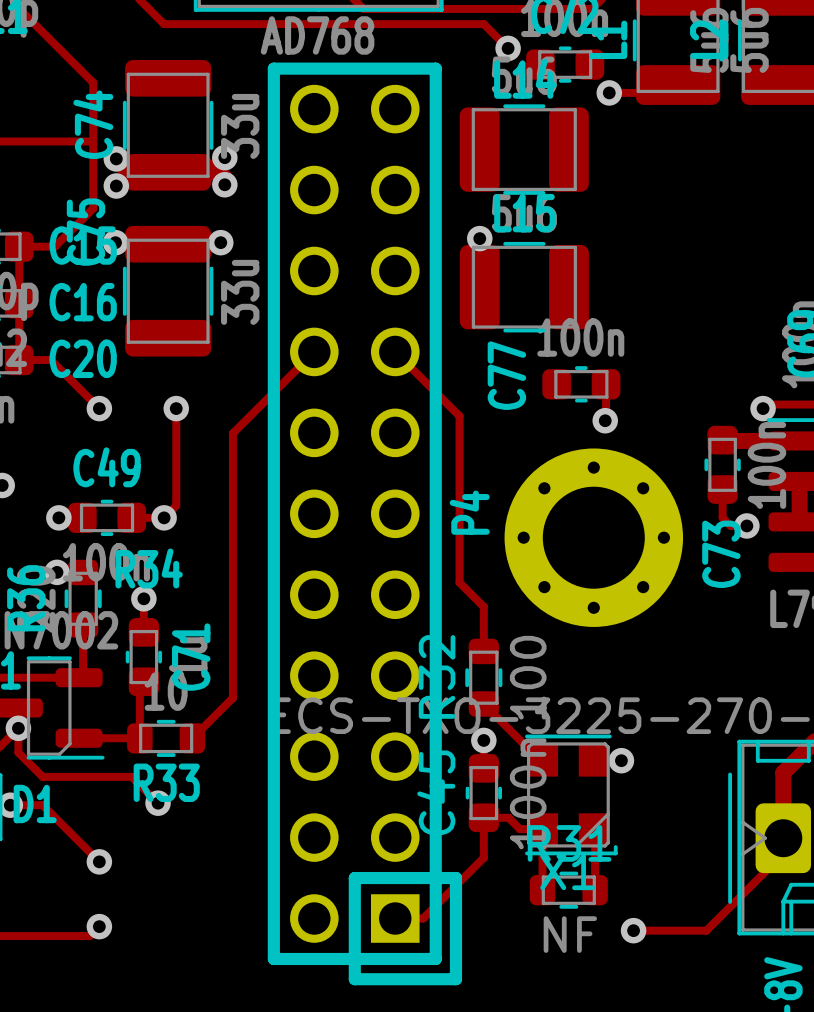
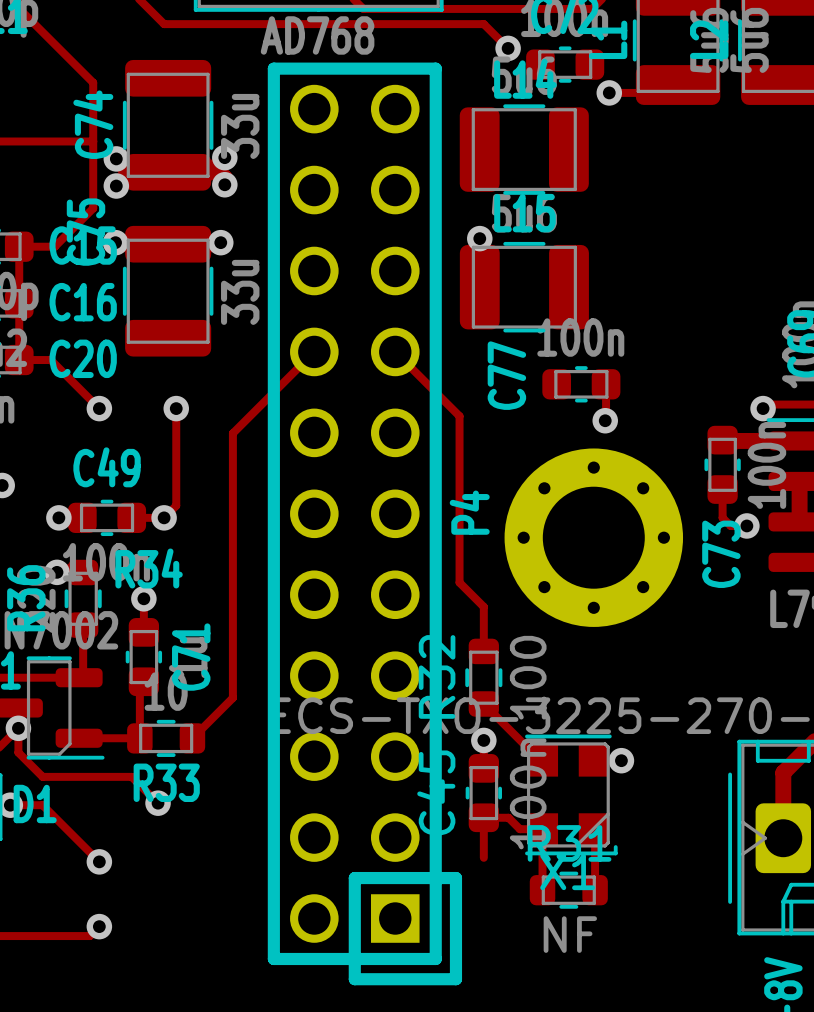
track: (783, 853) (706, 930) (633, 930) -> none
track: (483, 857) (423, 918) (395, 918) -> none
via: (633, 930) -> none

